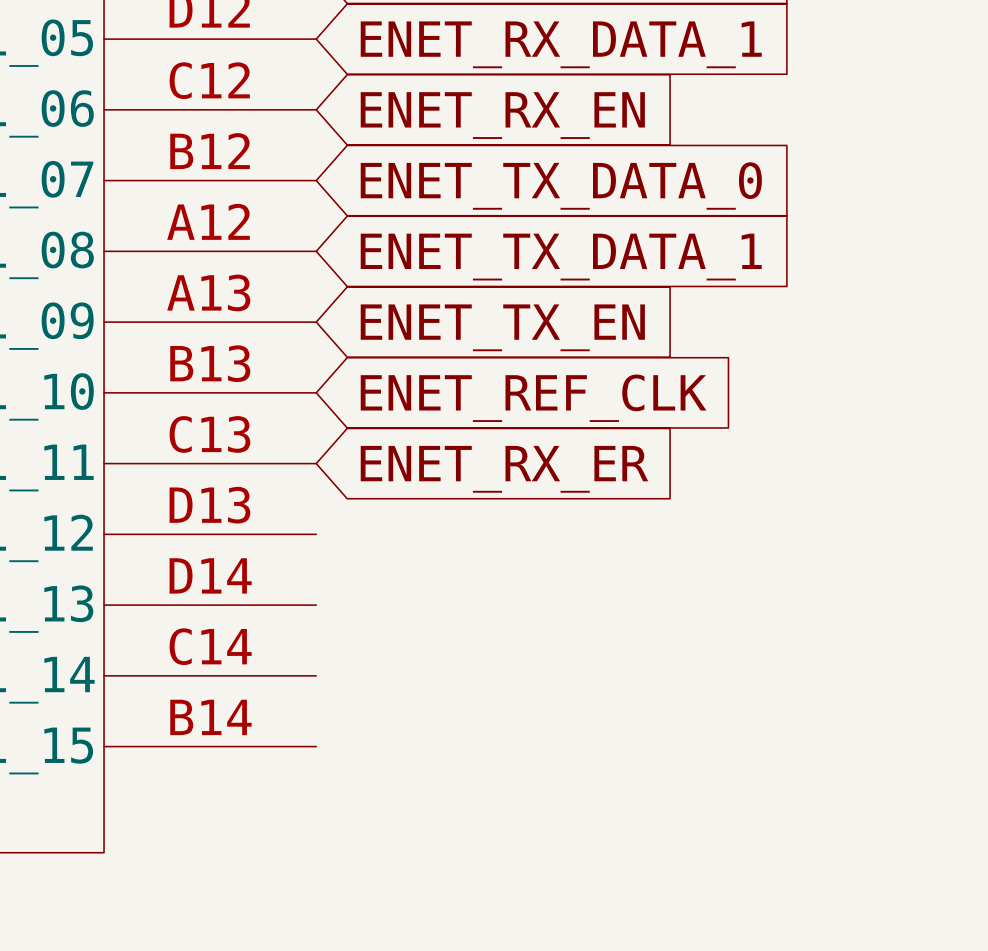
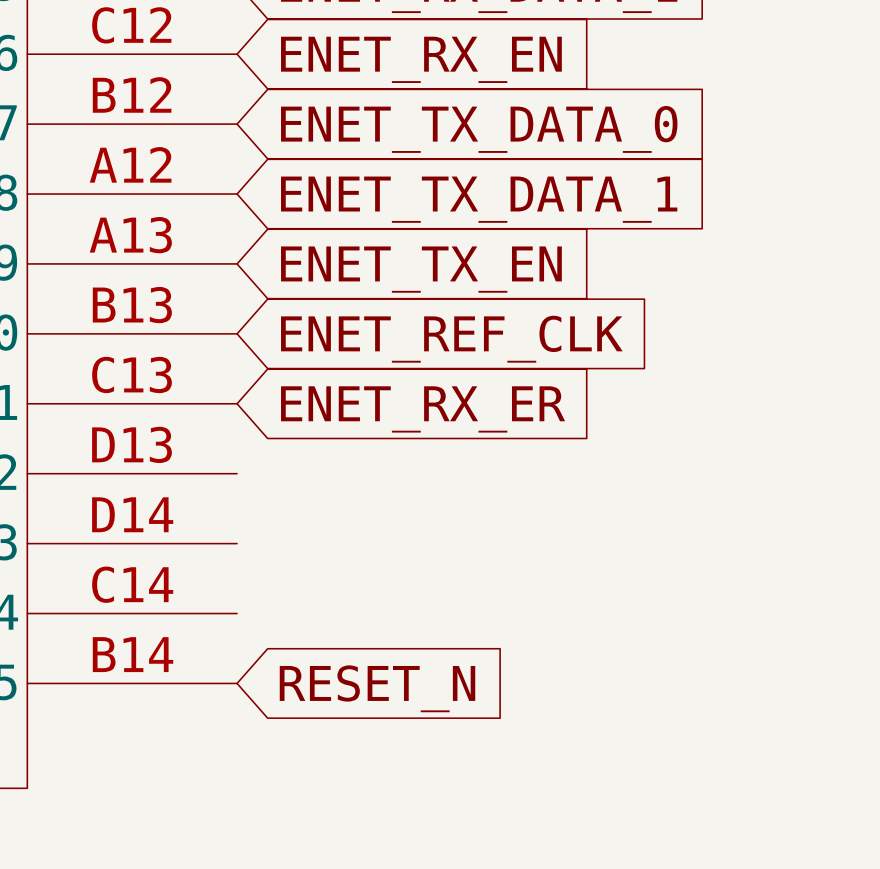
global label: none -> RESET_N (377, 688)

